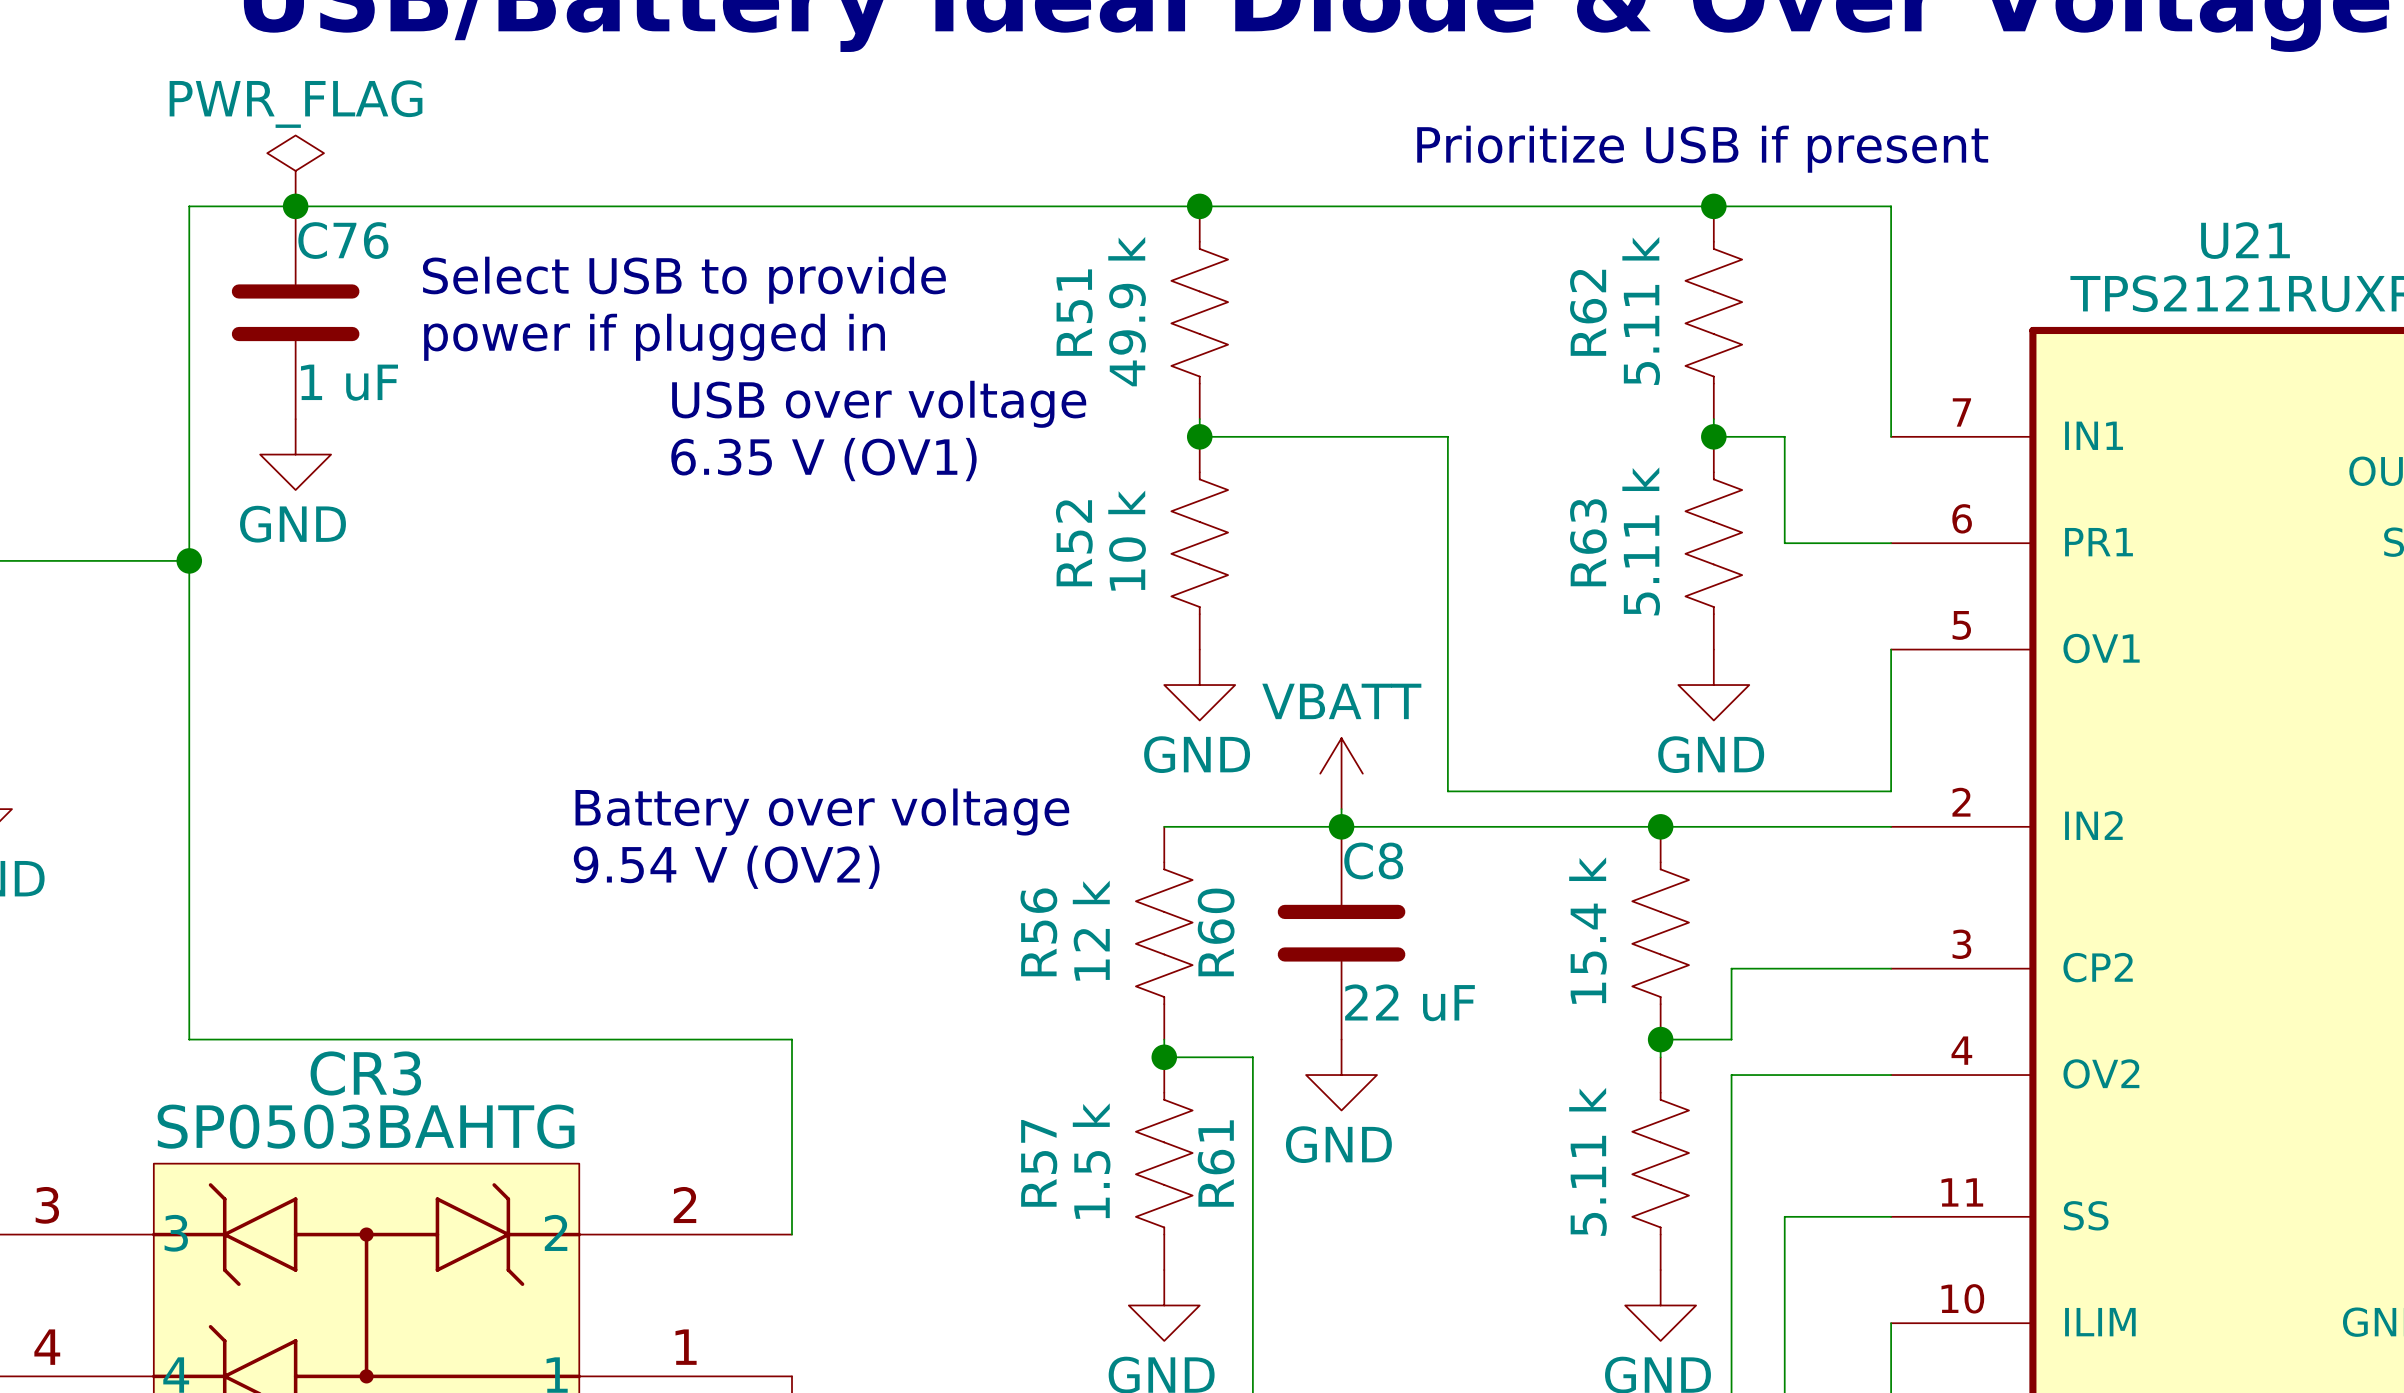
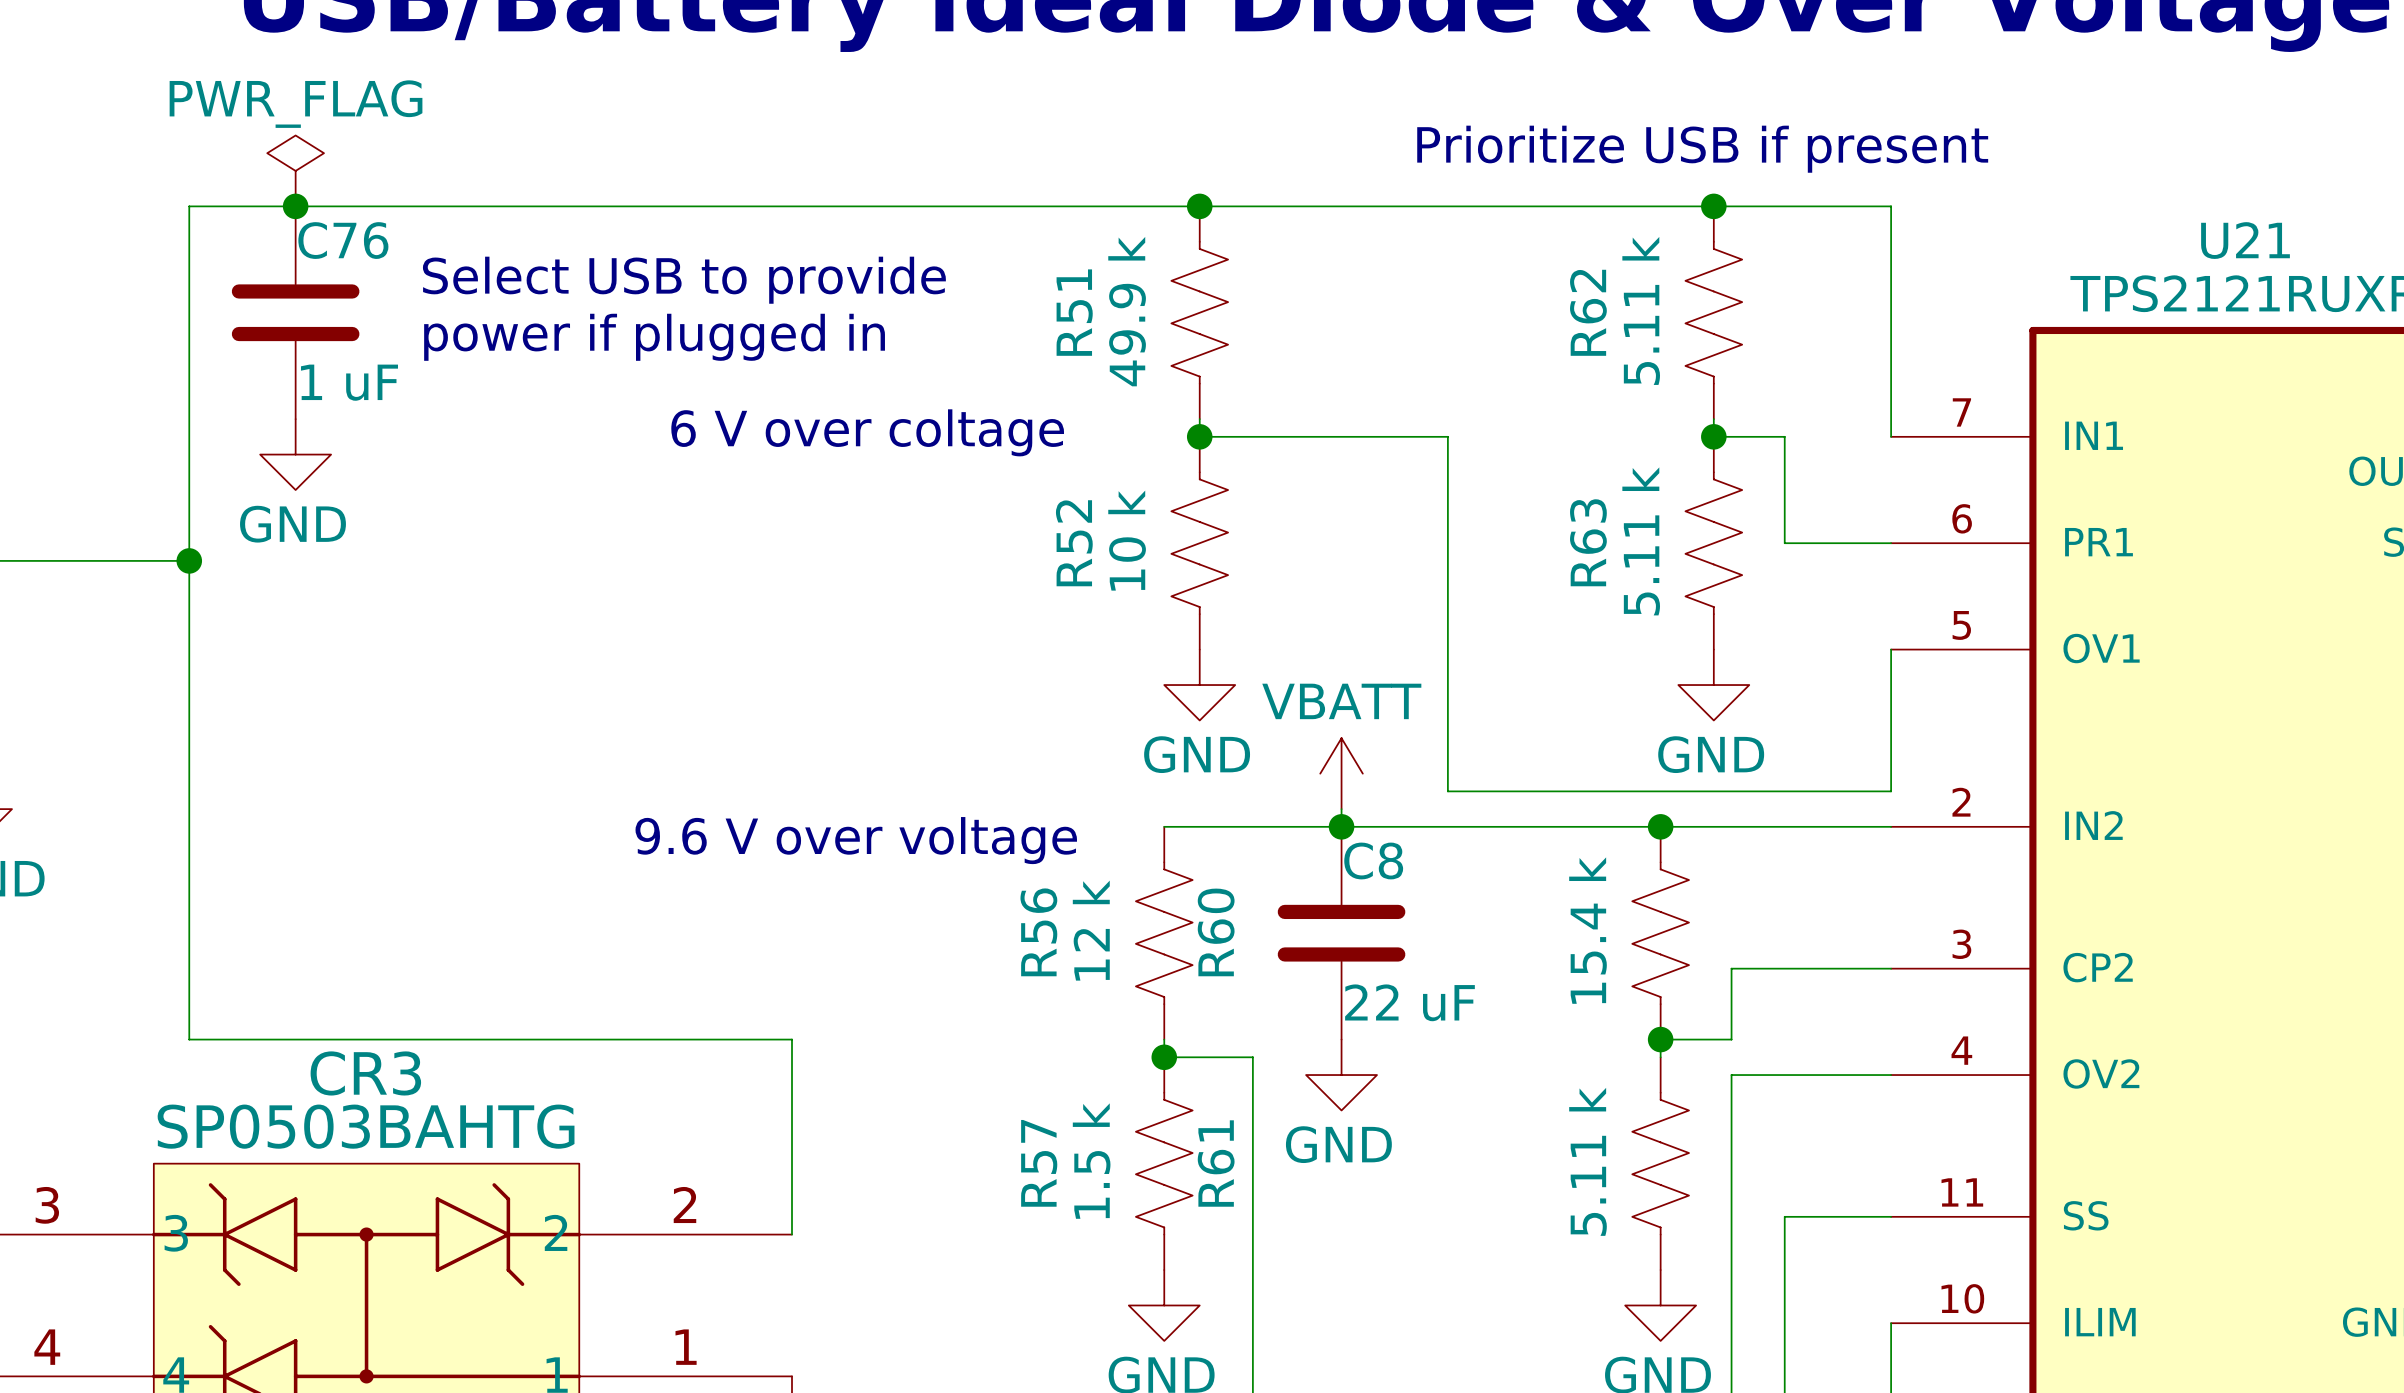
text: USB over voltage (879, 404) -> 6 V over coltage (867, 432)
text: 6.35 V (OV1) (823, 459) -> none
text: Battery over voltage (822, 812) -> 9.6 V over voltage (856, 840)
text: 9.54 V (OV2) (726, 867) -> none

